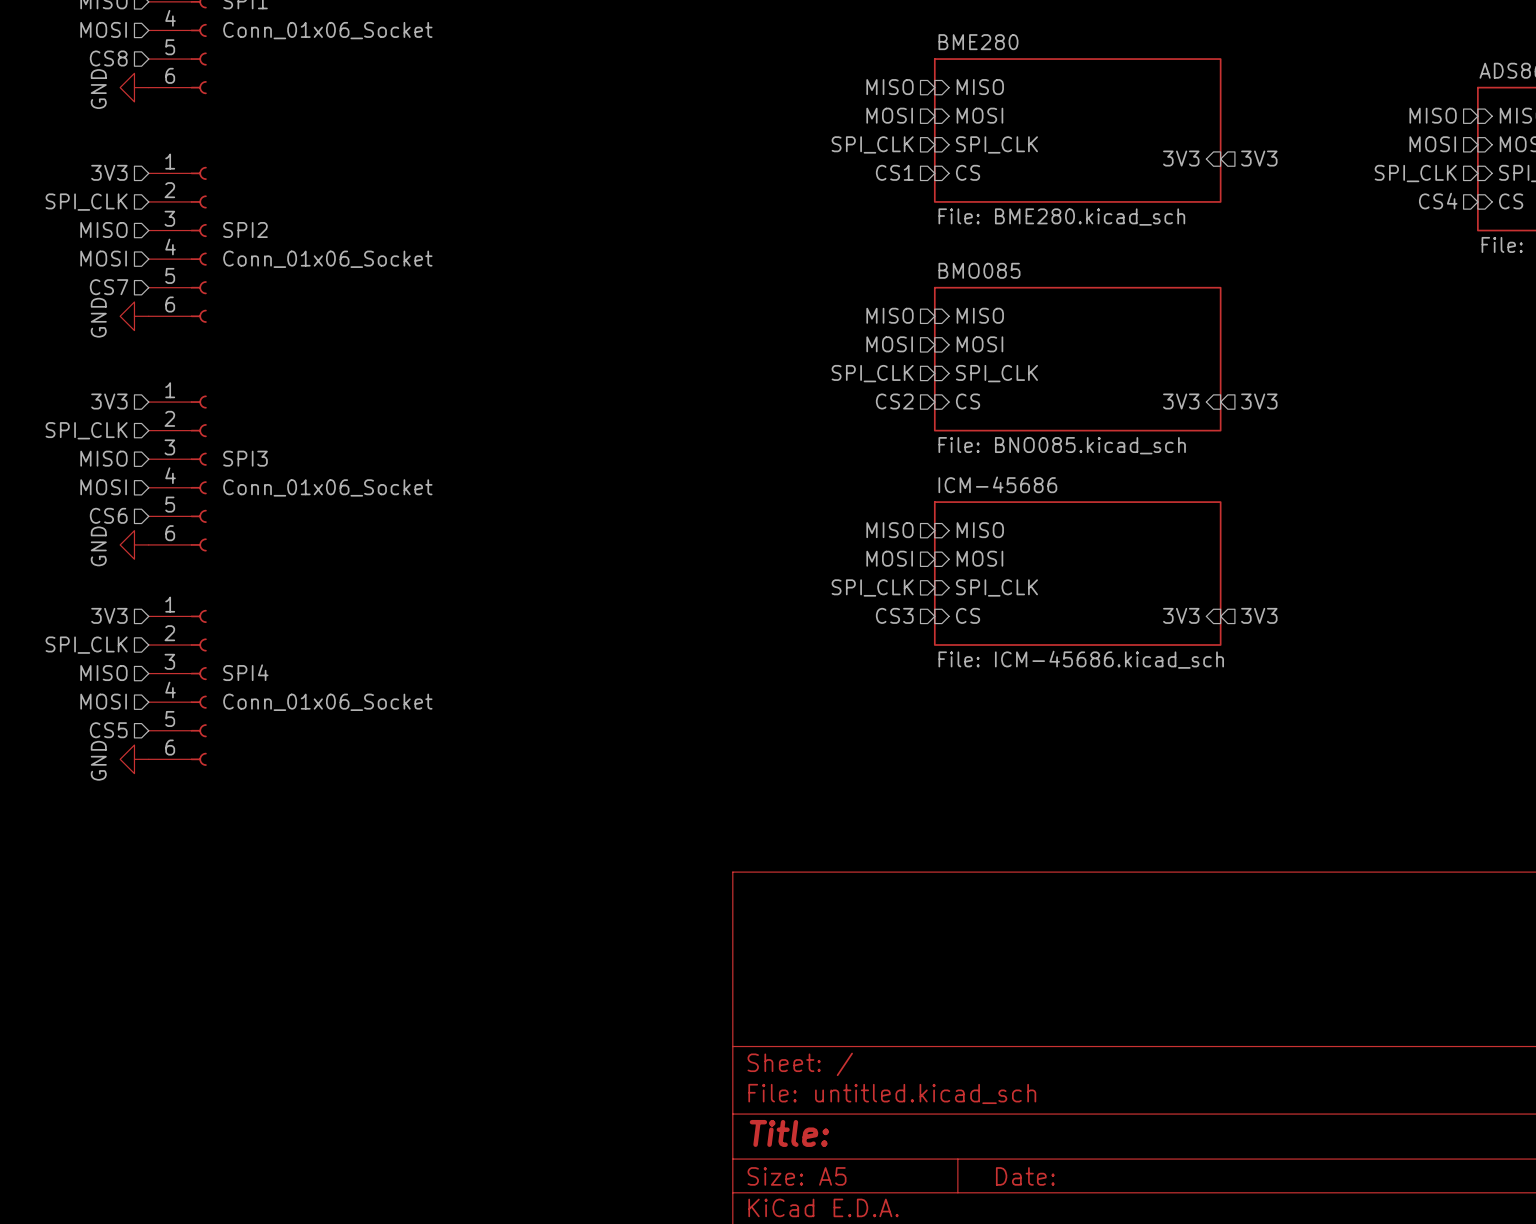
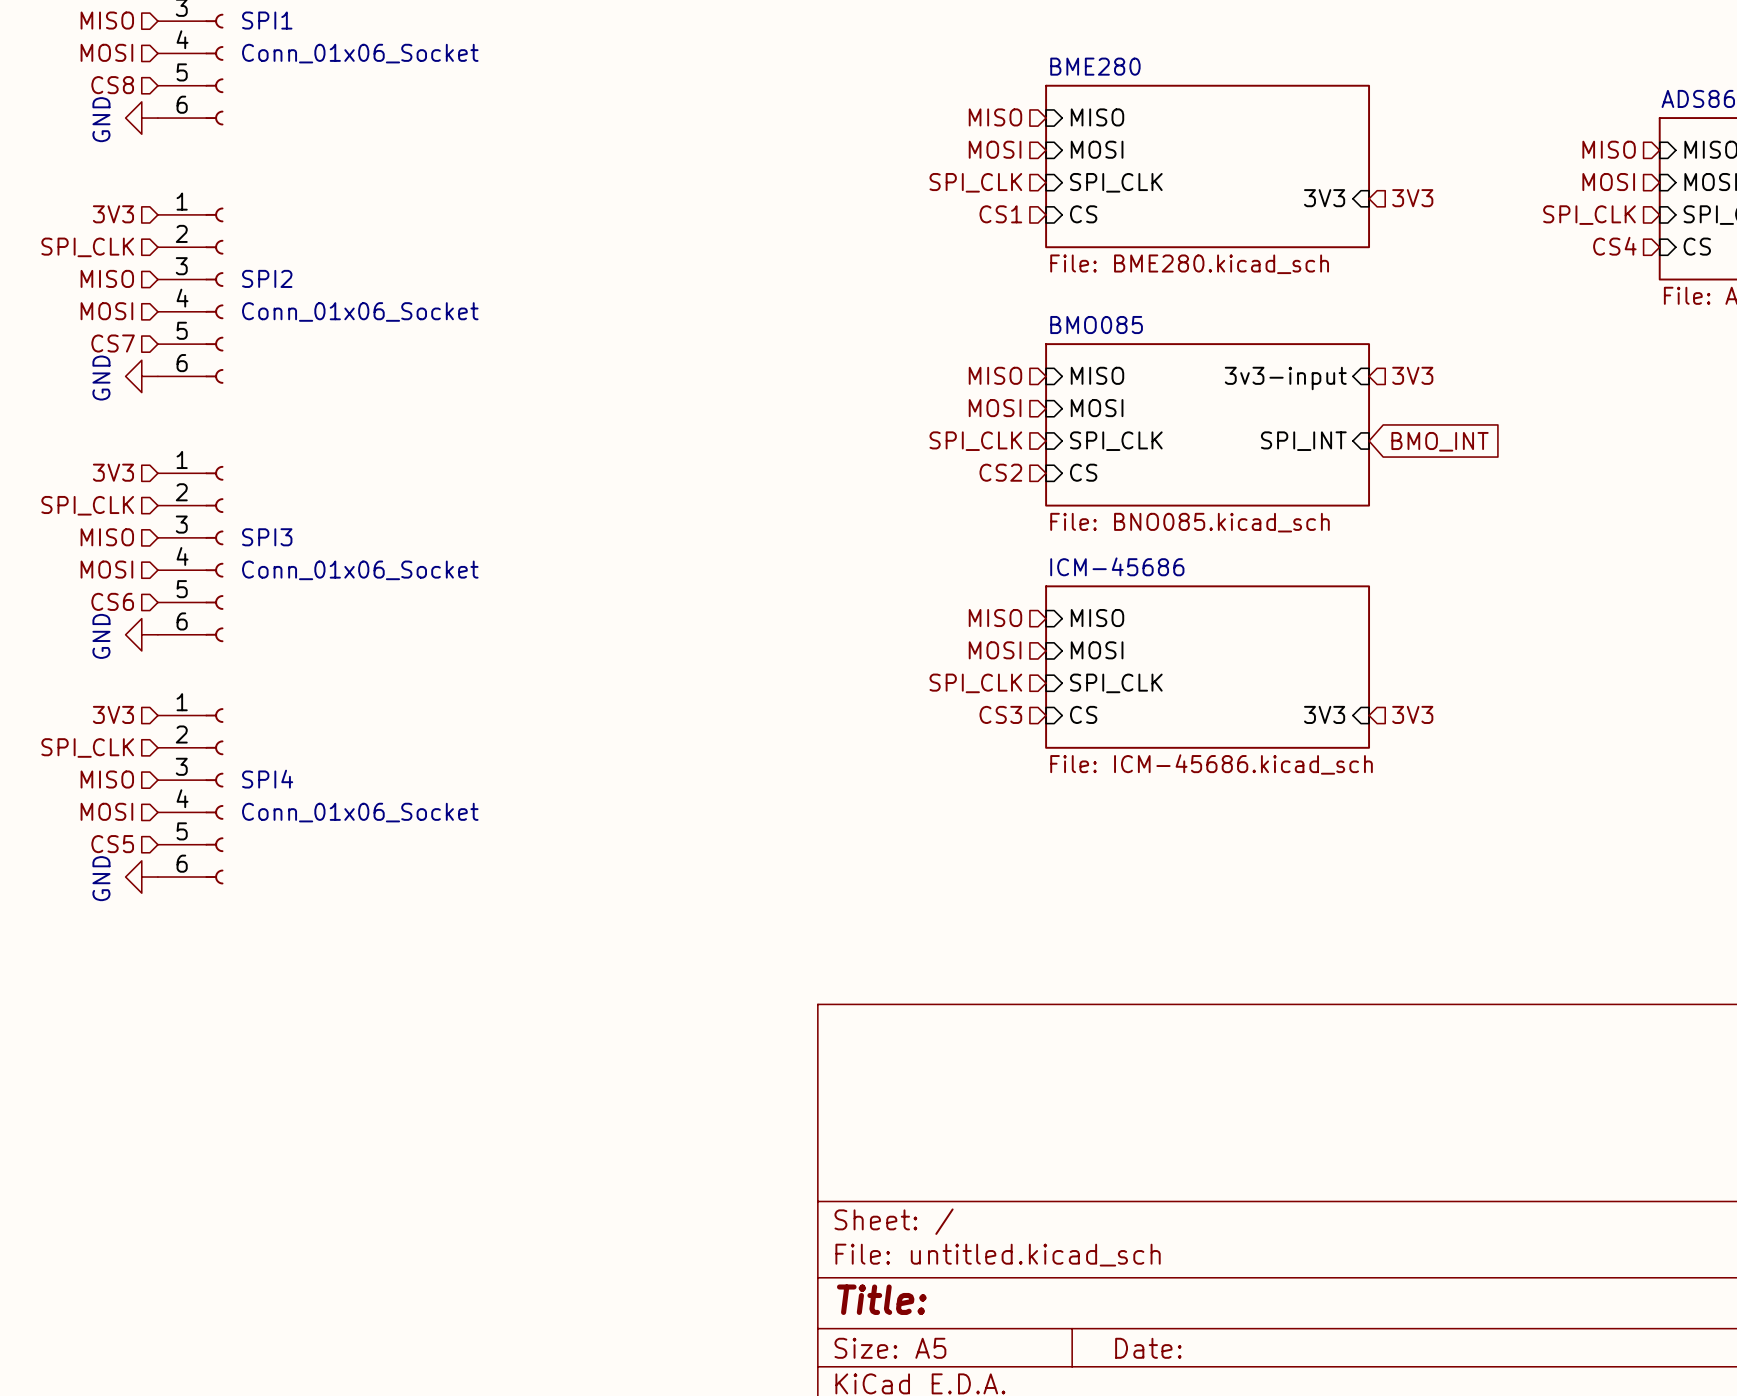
sheet pin: none -> 3v3-input (1285, 378)
sheet pin: none -> SPI_INT (1303, 441)
global label: none -> BMO_INT (1440, 441)
sheet pin: 3V3 (1181, 401) -> none
hierarchical label position: 3V3 (1259, 401) -> 3V3 (1412, 375)

